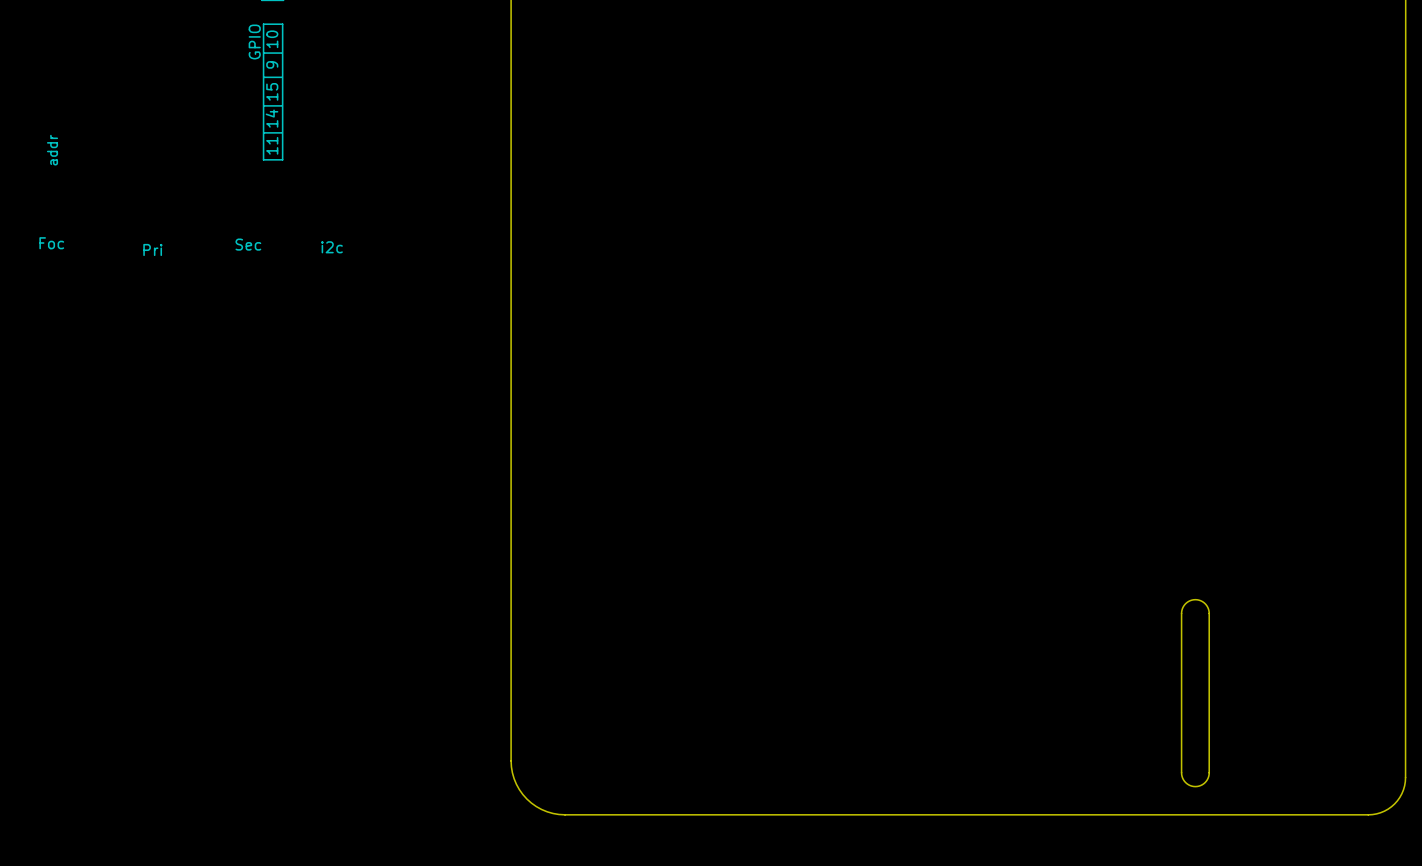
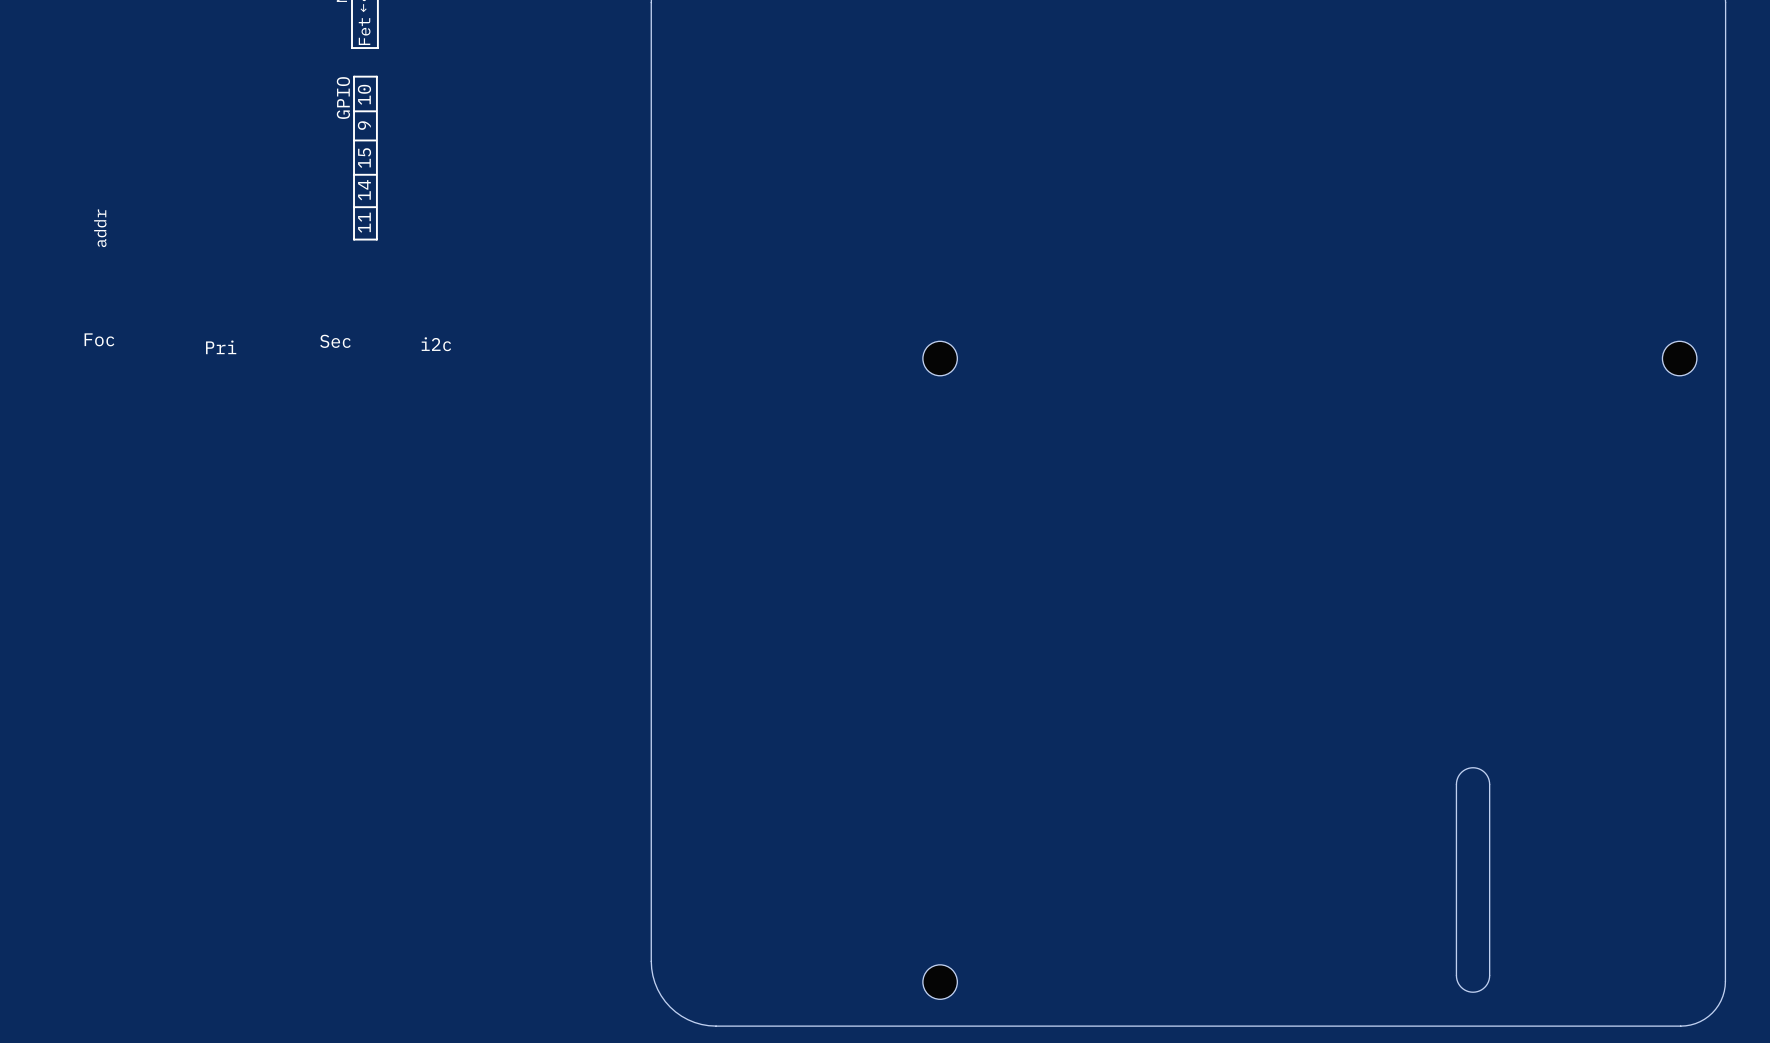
part: none -> (940, 358)
part: none -> (1679, 358)
part: none -> (940, 982)

